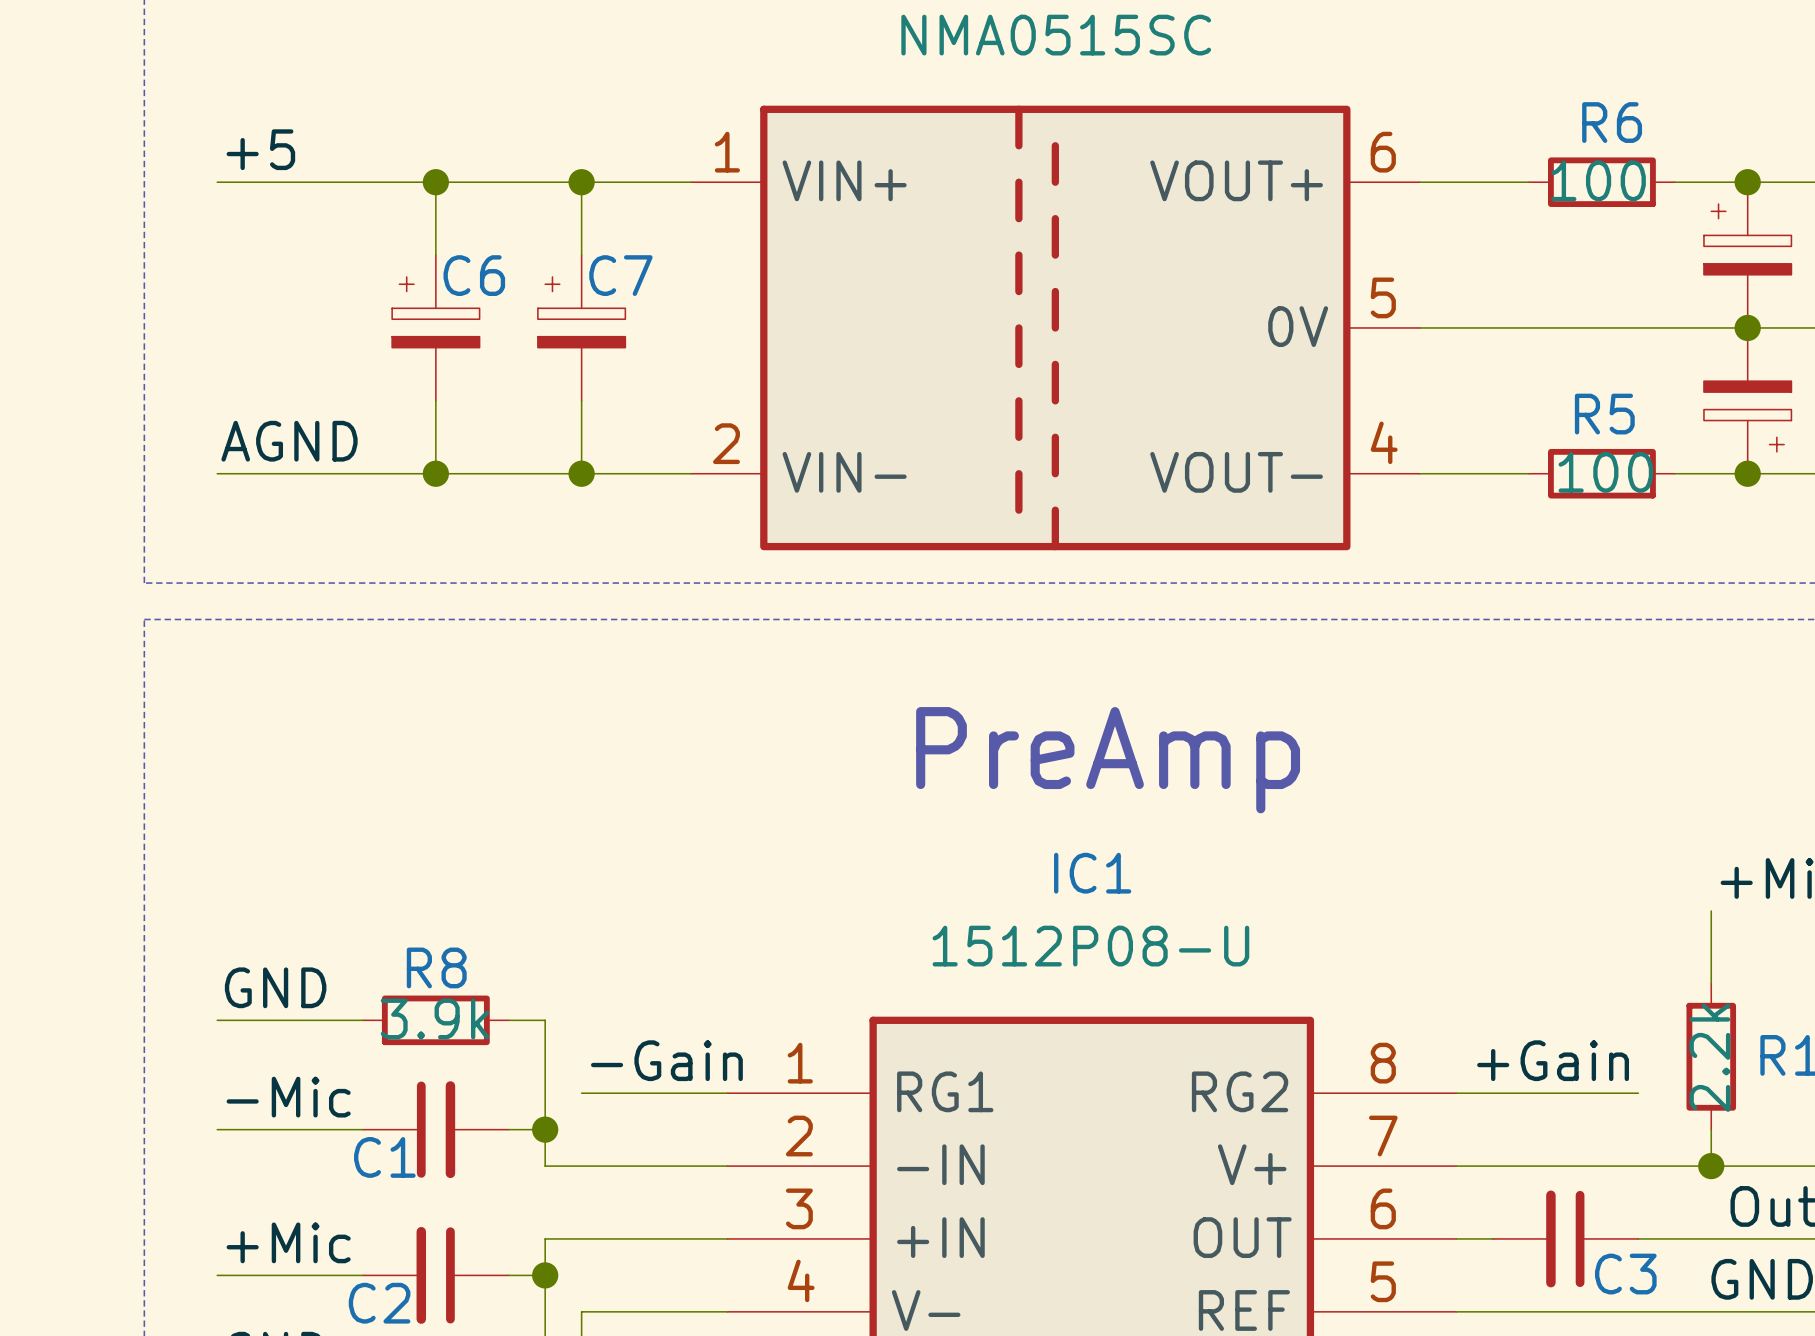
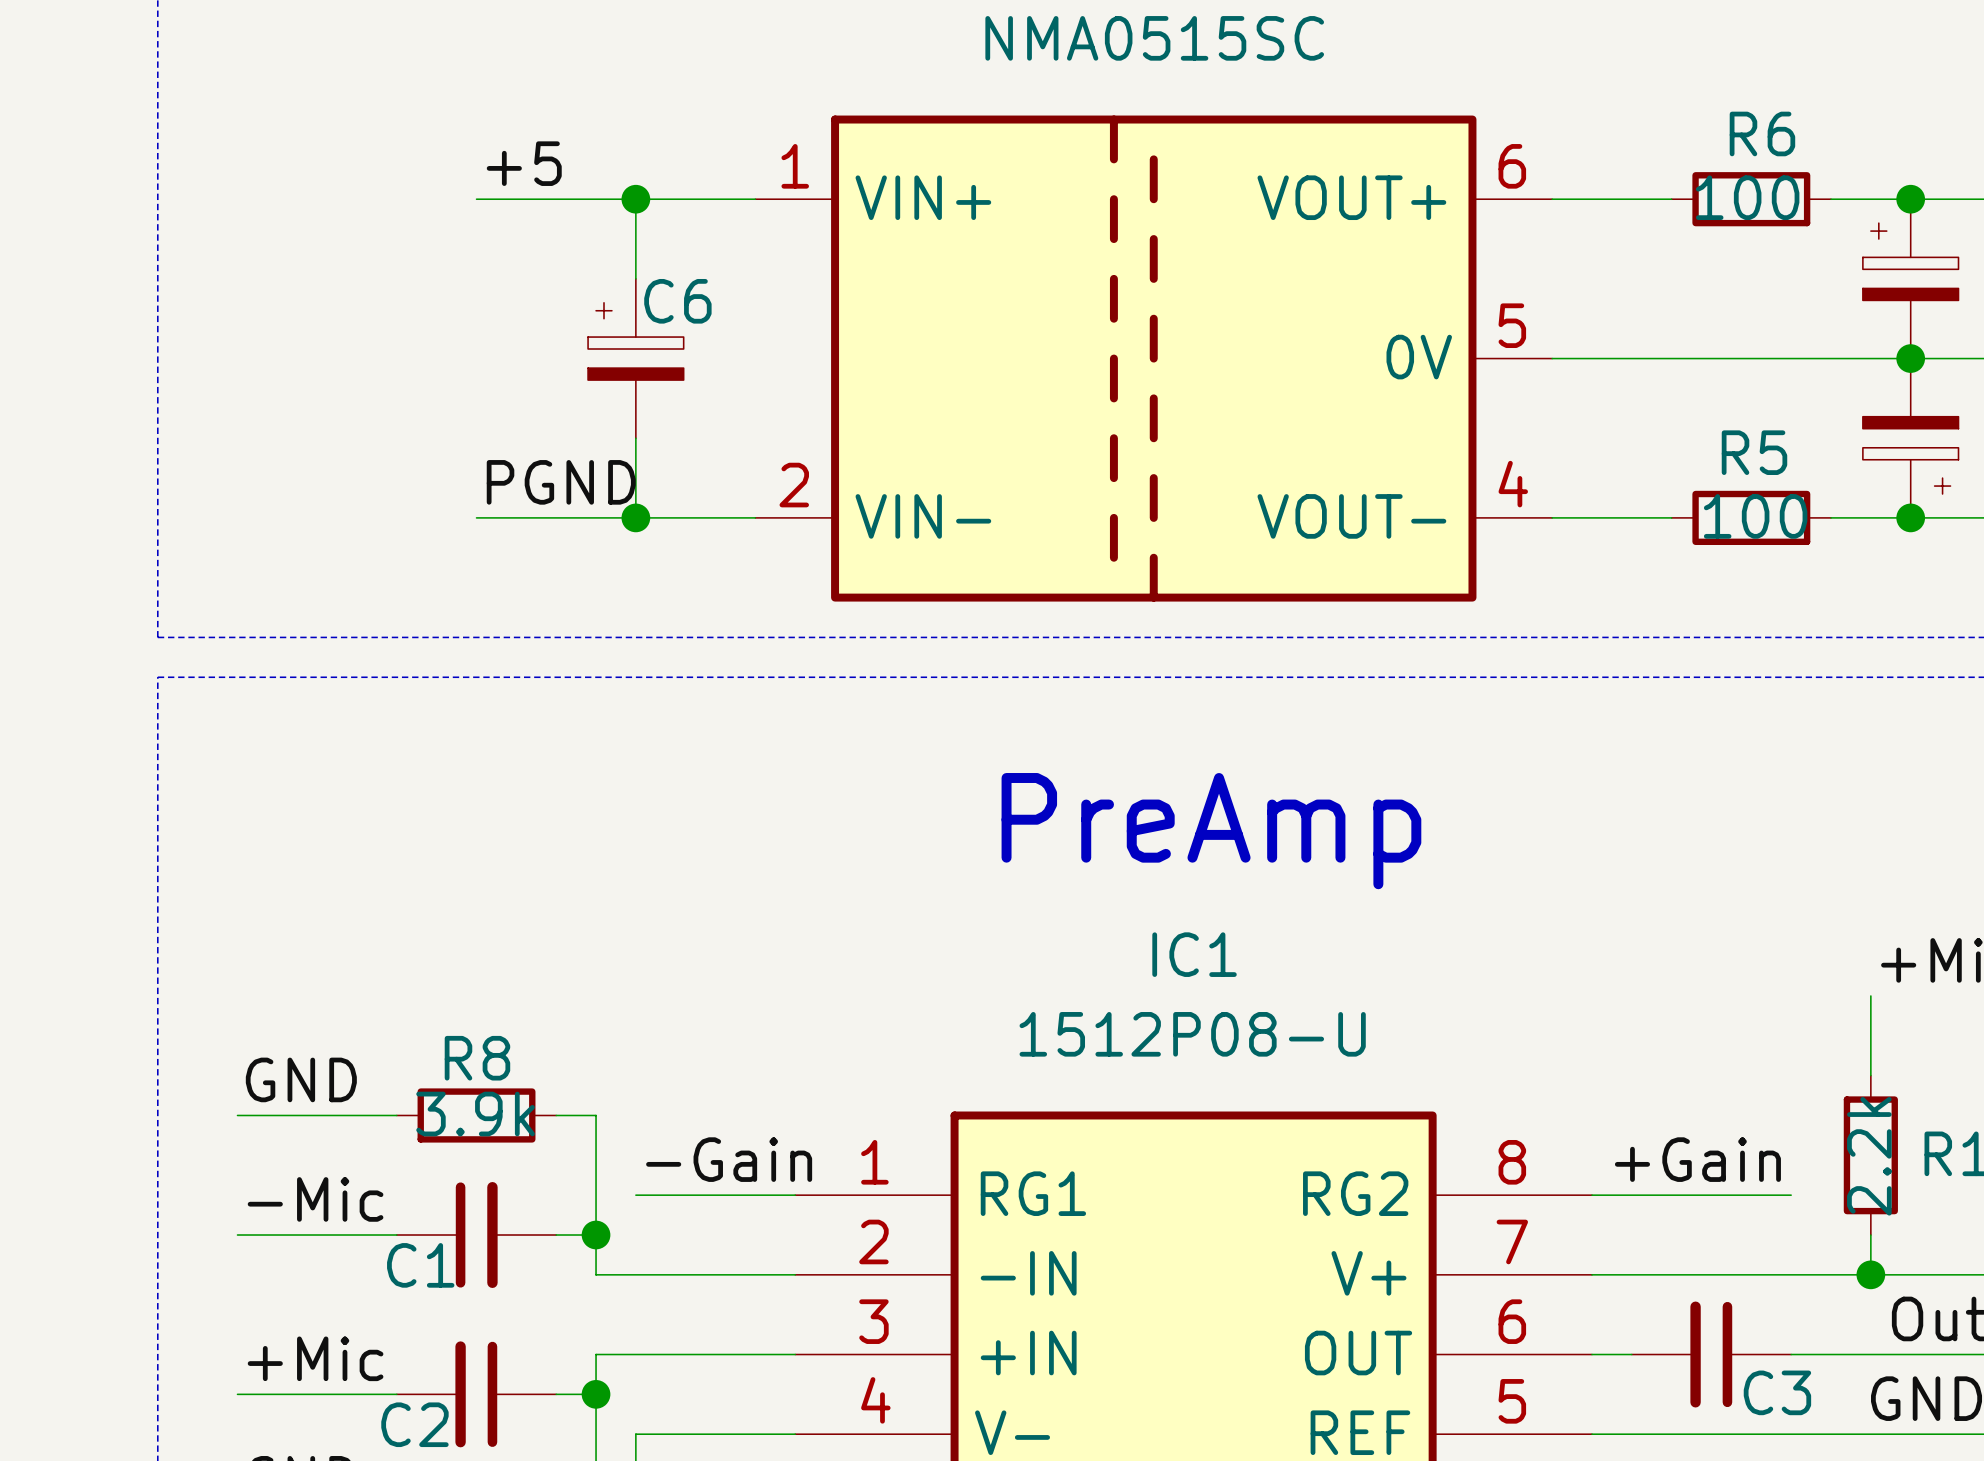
label position: +5 (260, 149) -> +5 (524, 163)
wire: (217, 182) (435, 182) (435, 255) -> none
junction: (435, 182) -> none
C7 name: C7 (620, 275) -> C6 (677, 301)
C6: (435, 327) -> none
wire: (435, 400) (435, 473) (217, 473) -> none
label: AGND (289, 441) -> none
label: none -> PGND (561, 482)
junction: (435, 473) -> none

